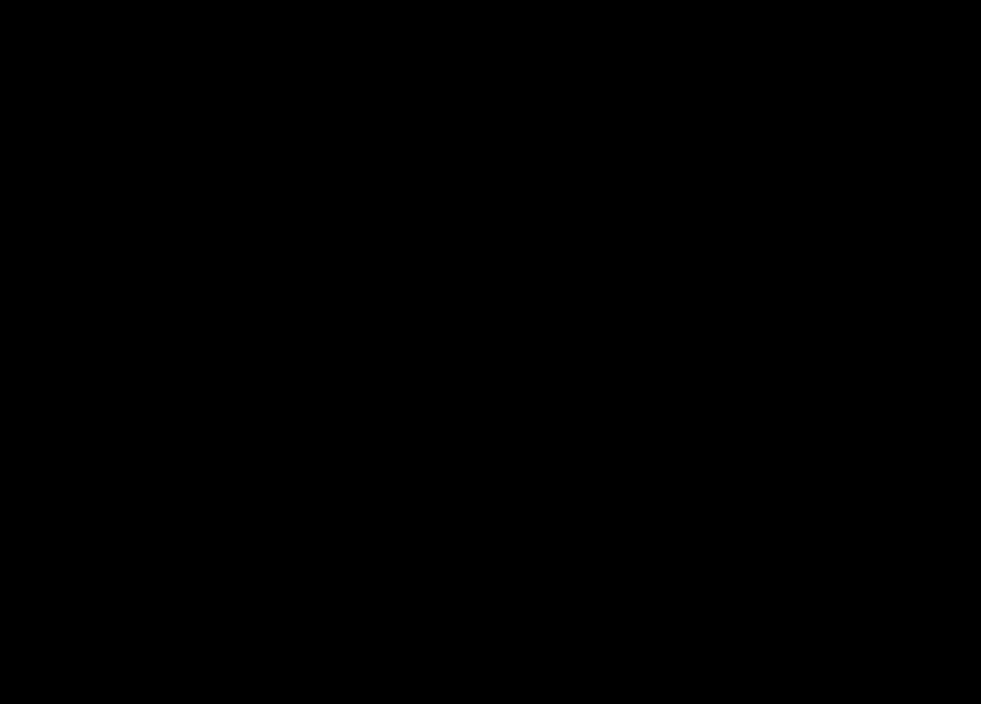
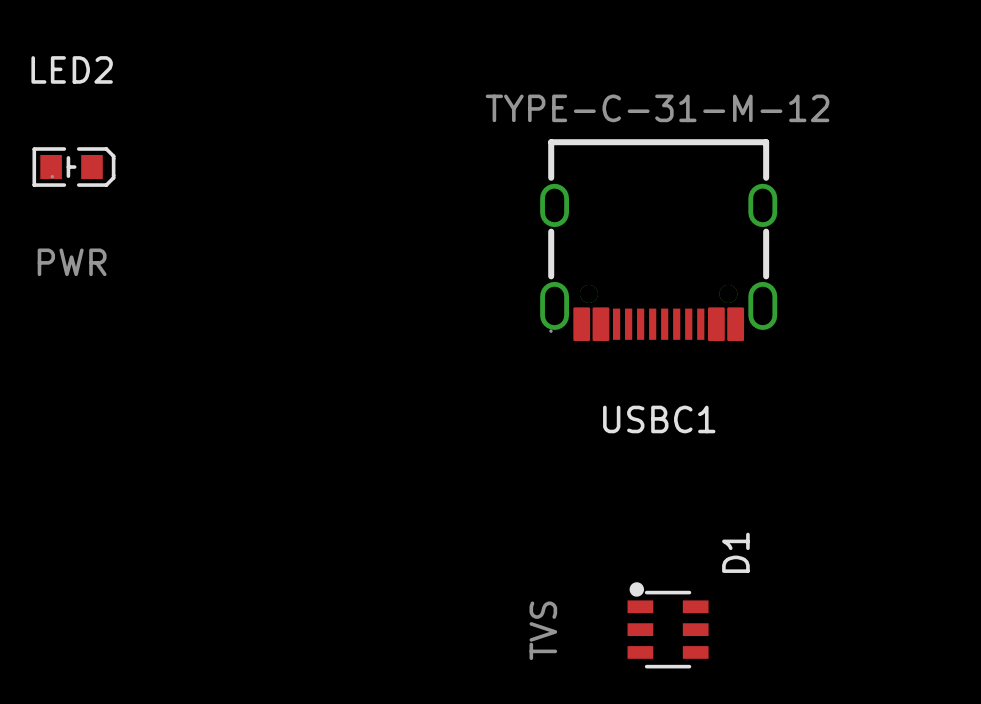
LED2: none -> PWR (73, 167)
USBC1: none -> TYPE-C-31-M-12 (658, 240)
D1: none -> TVS (668, 625)

